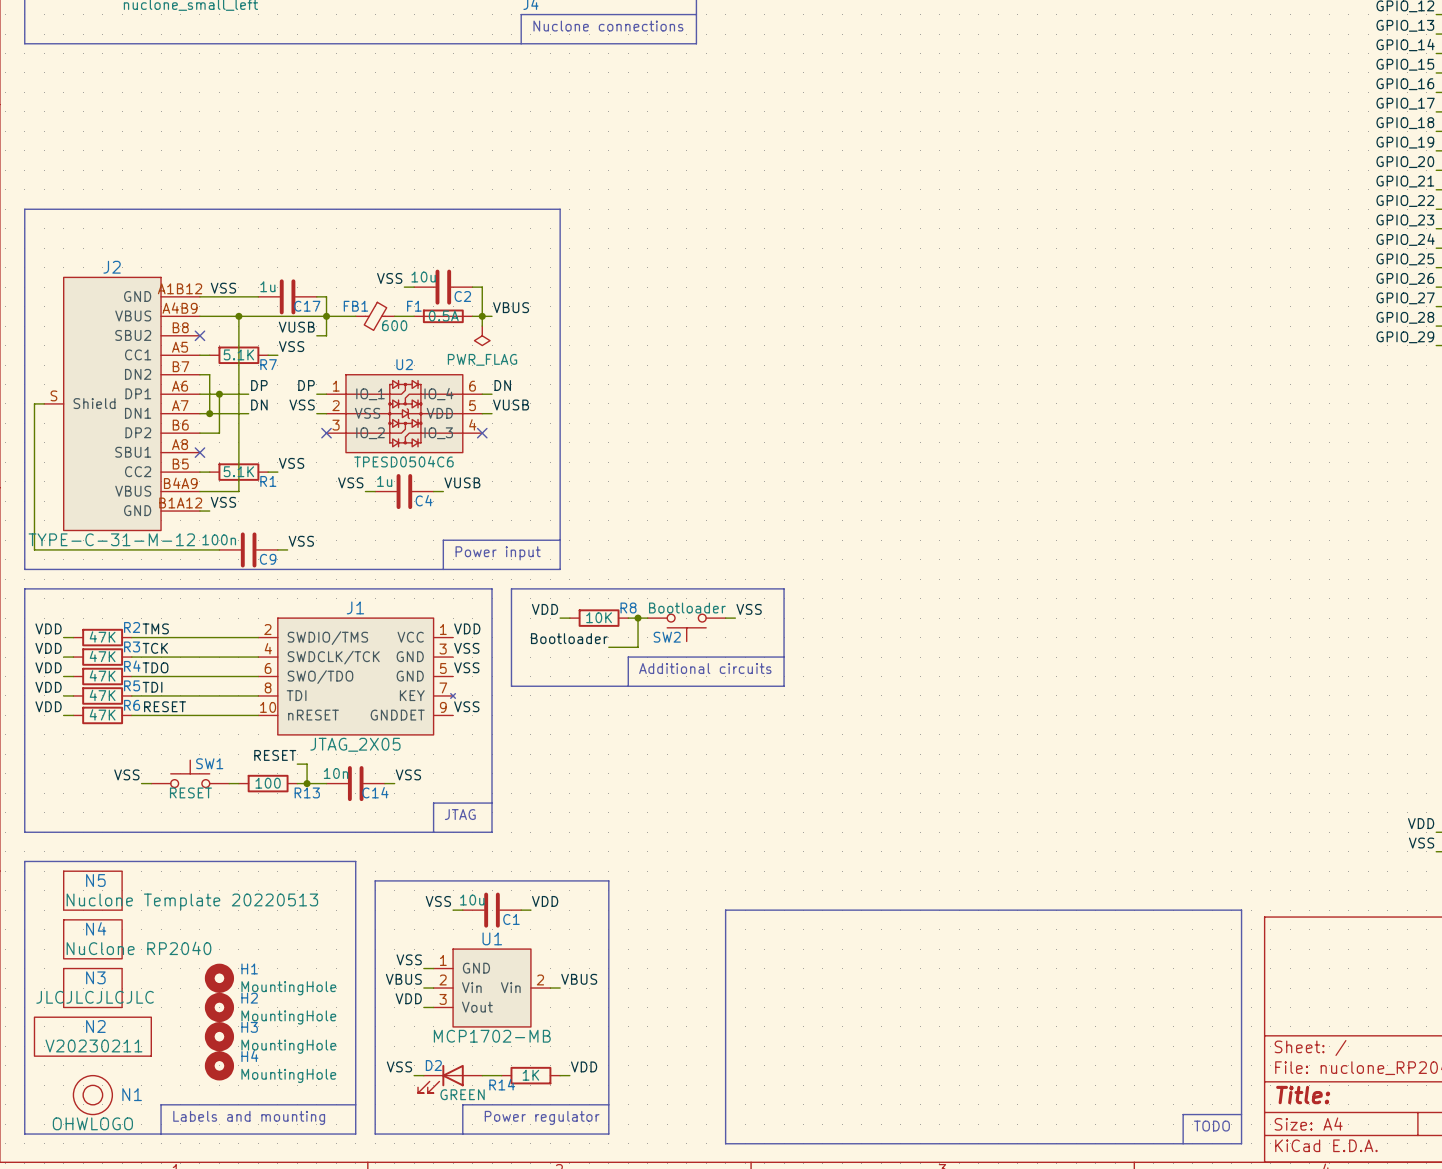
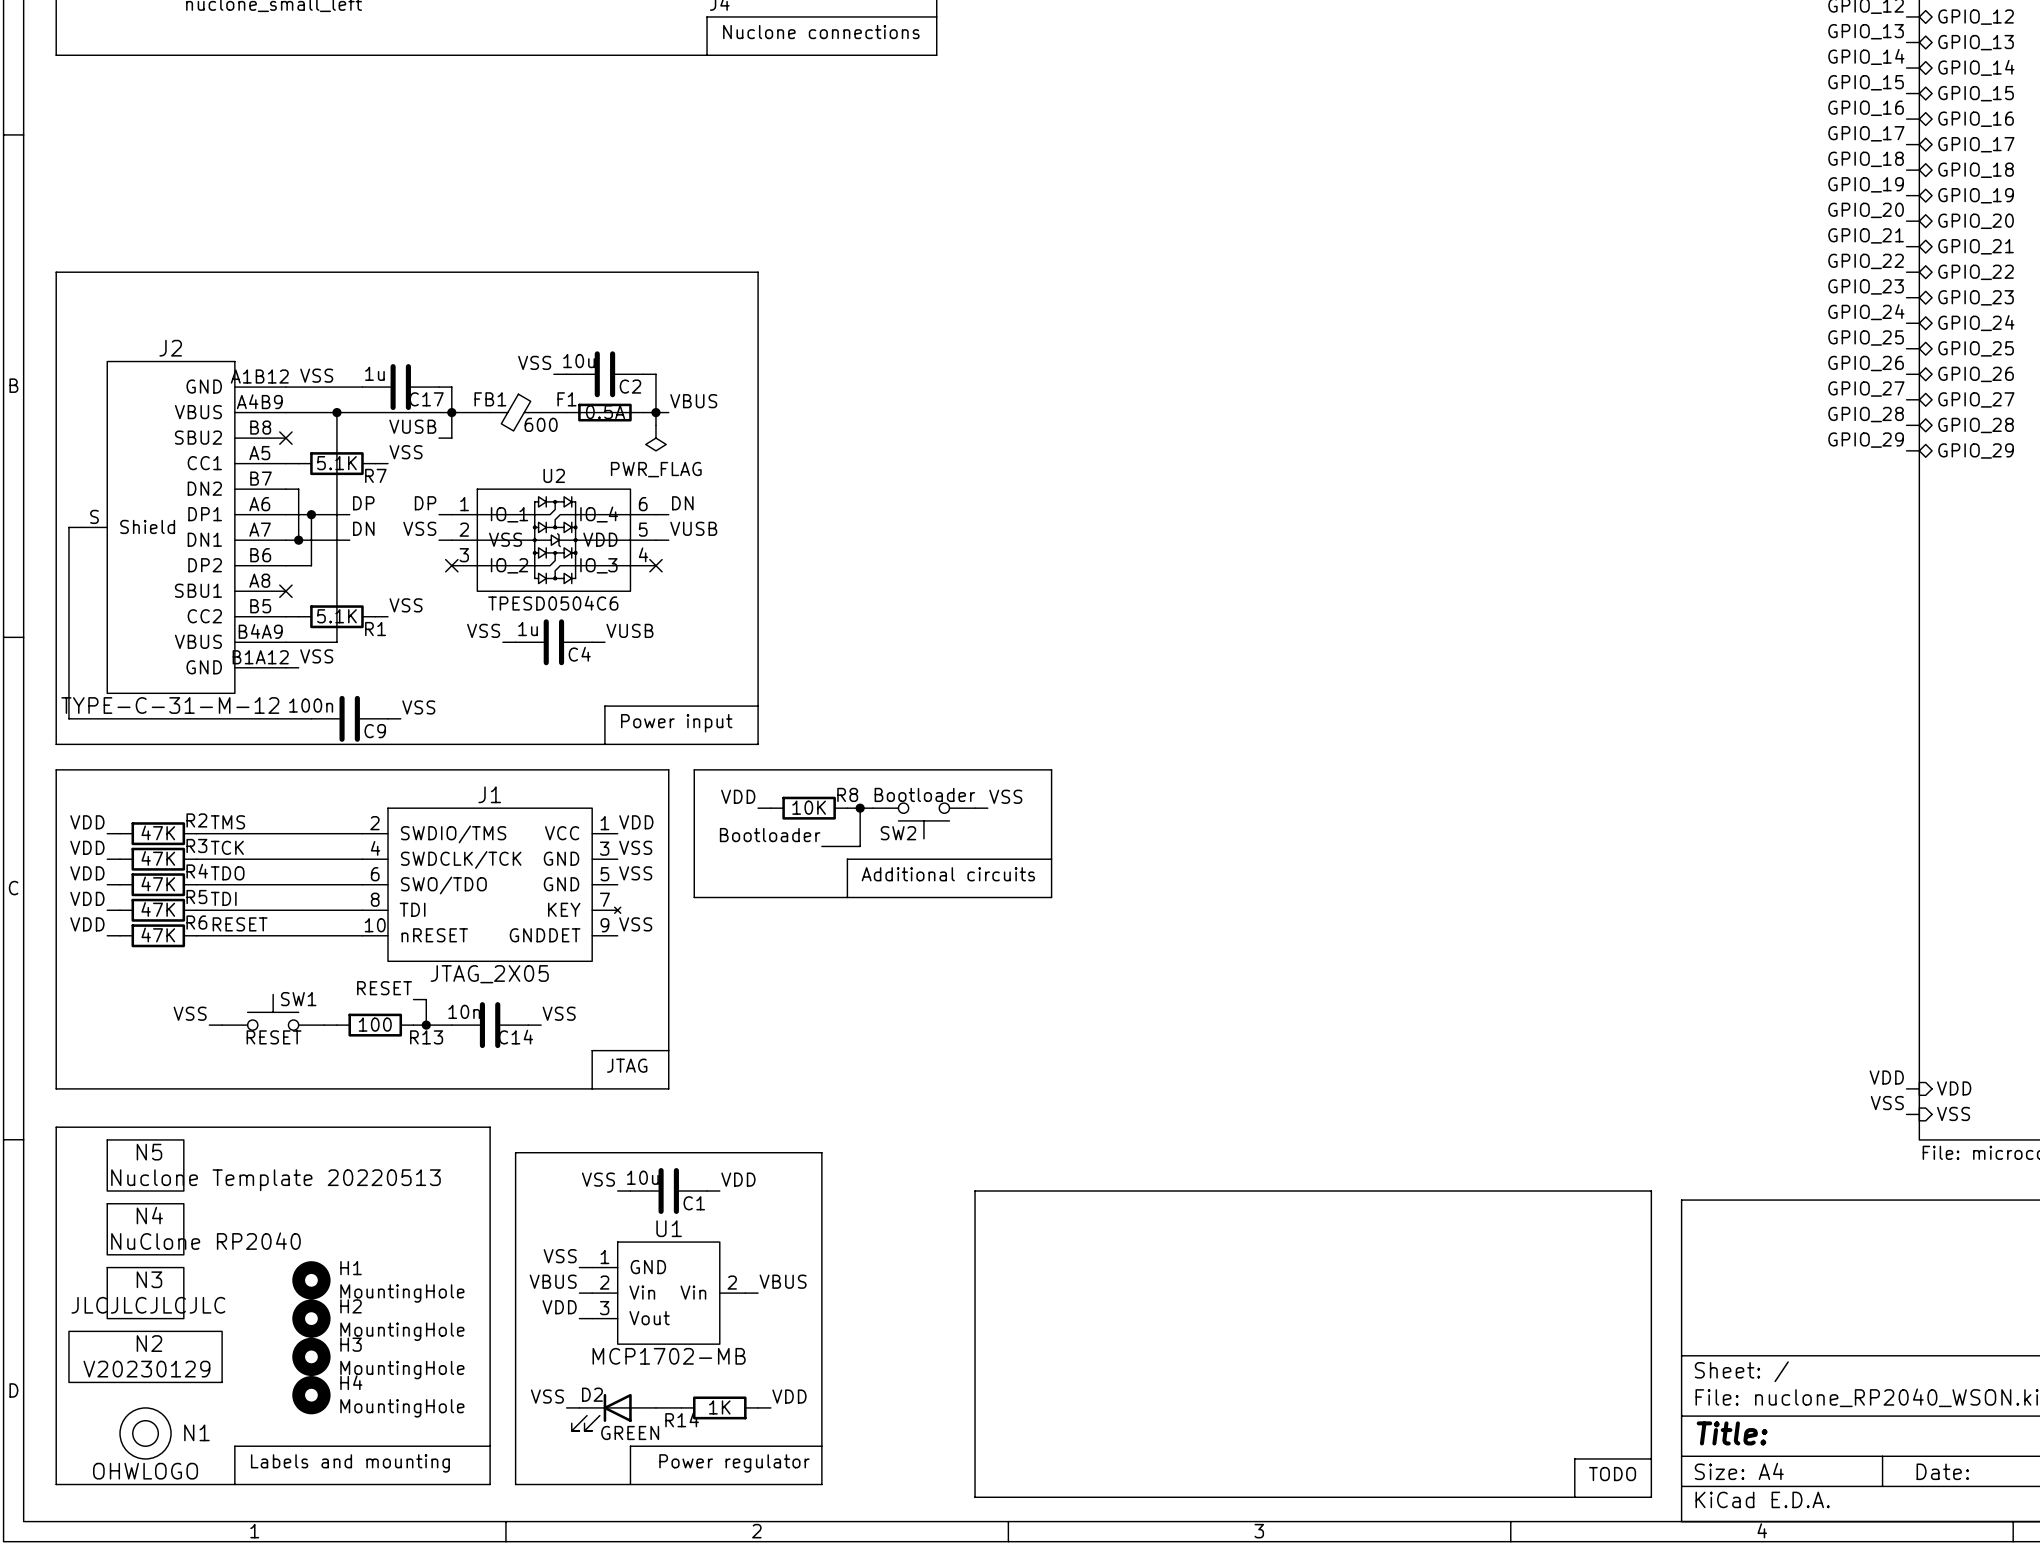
N2 value: V20230211 (93, 1045) -> V20230129 (146, 1369)

